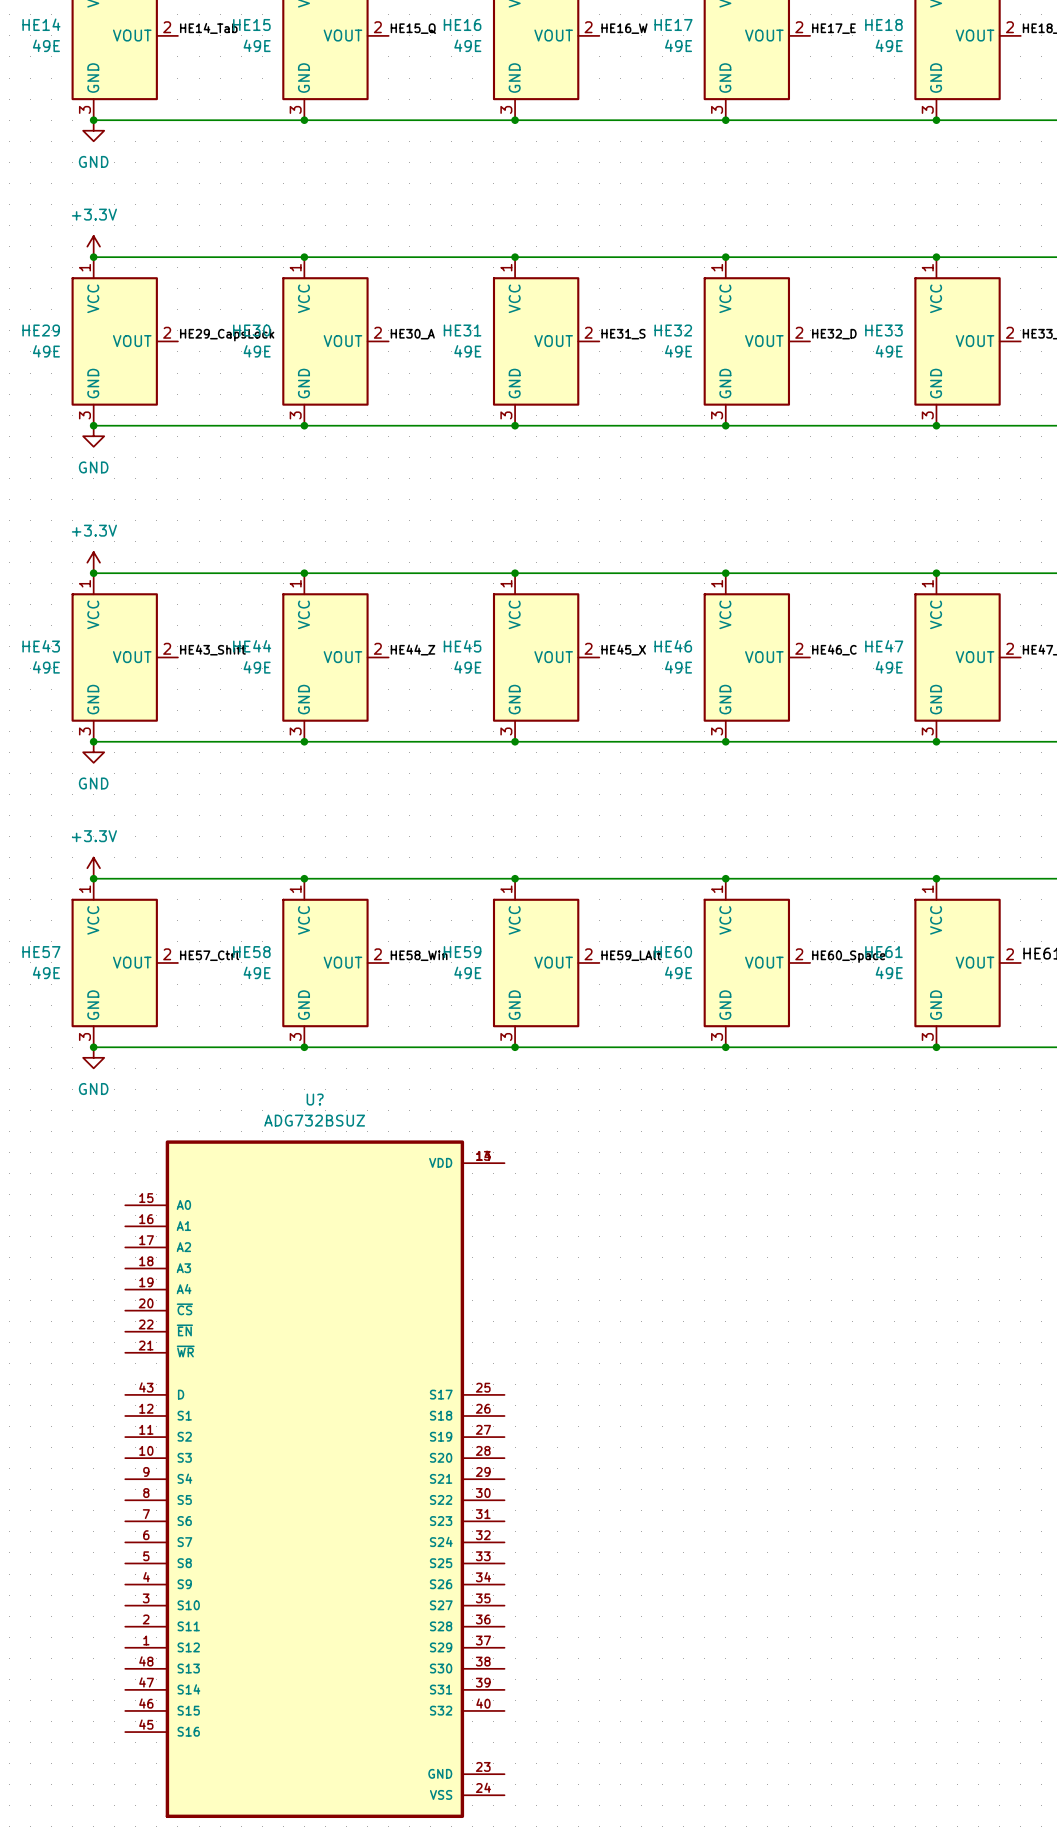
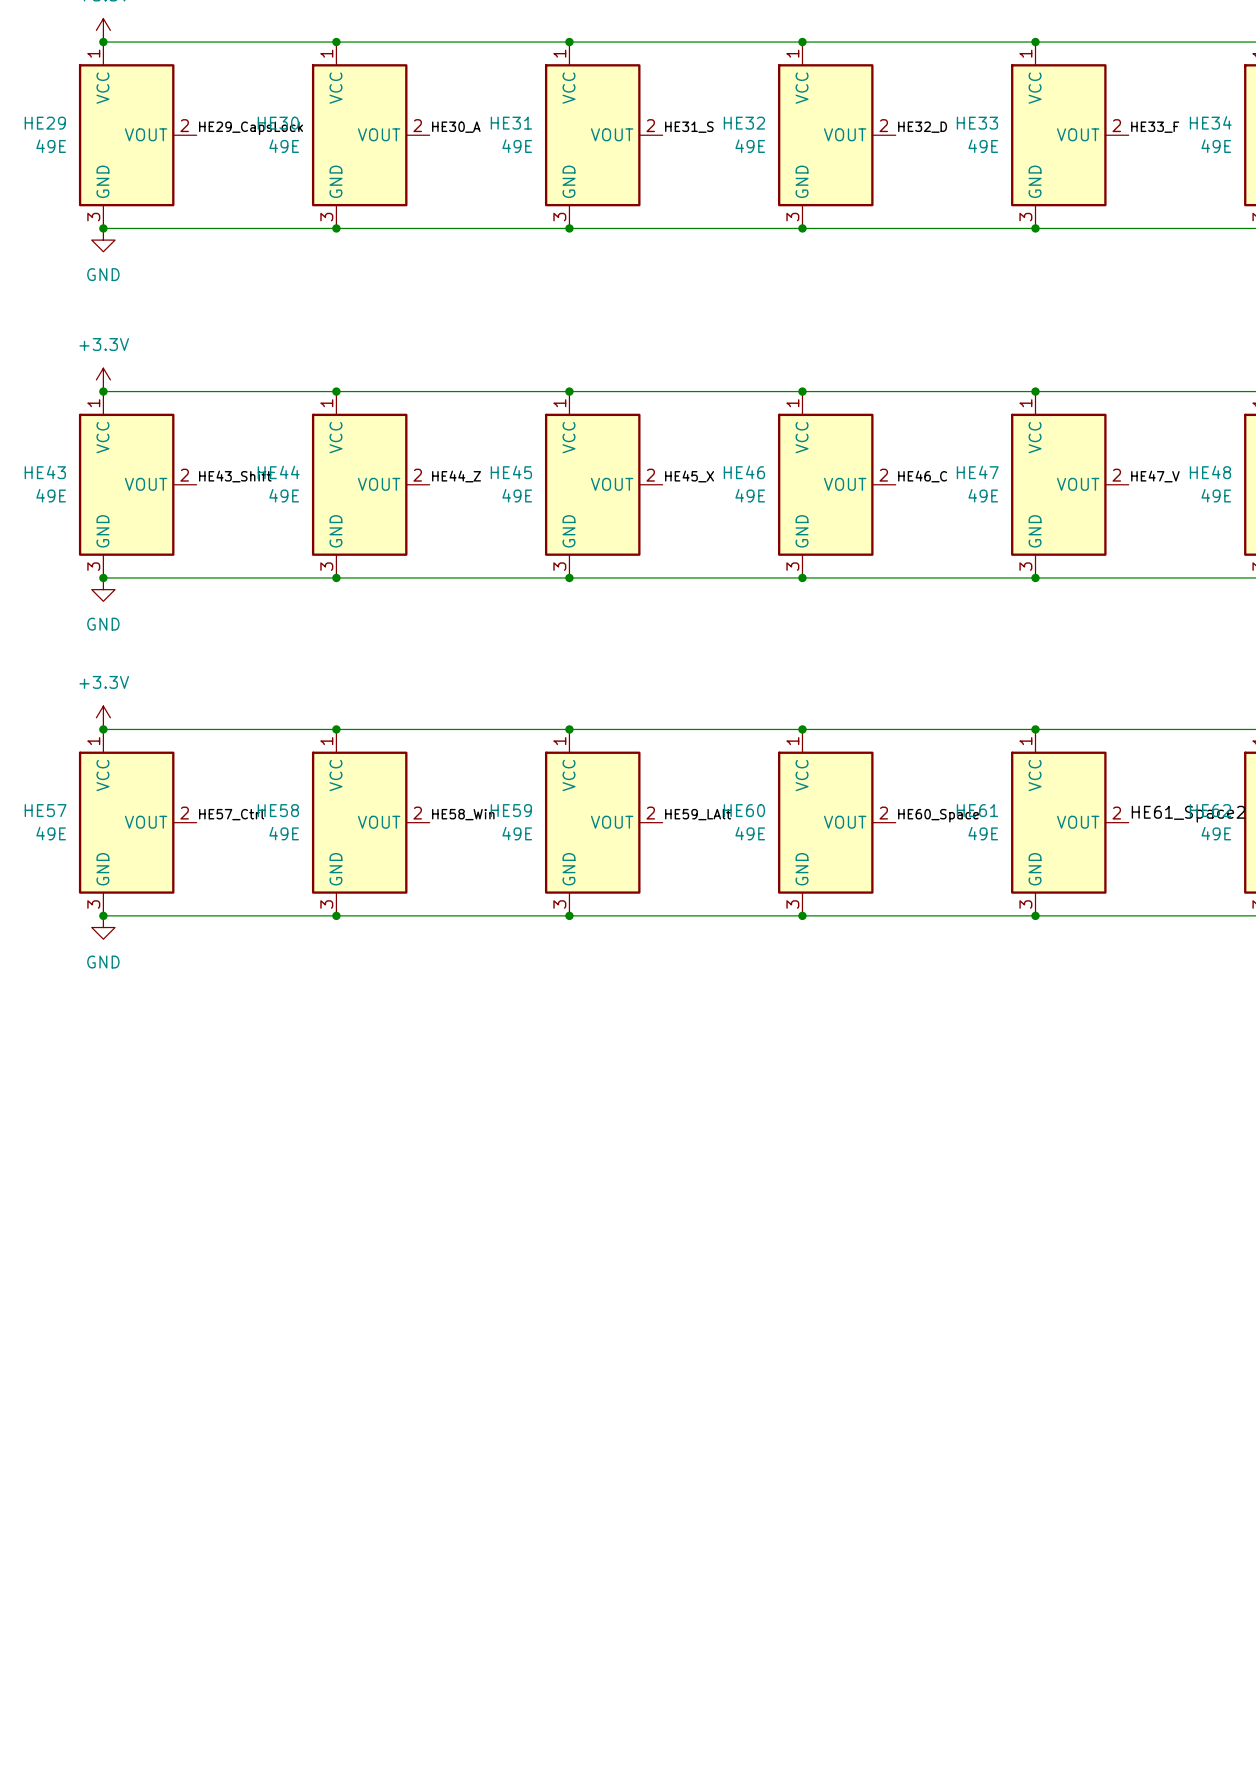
U?: ADG732BSUZ (314, 1479) -> none

